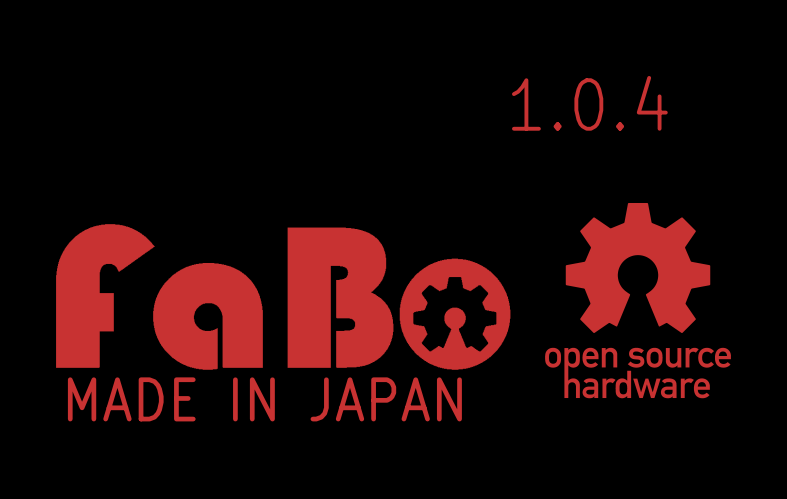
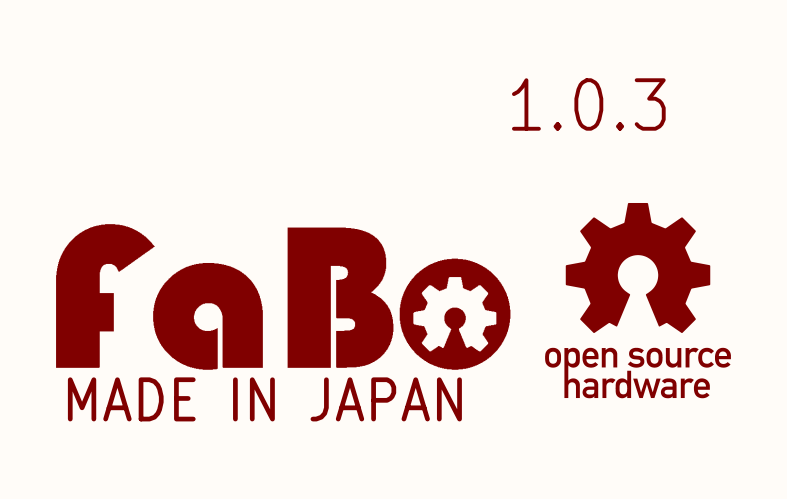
text: 1.0.4 (589, 103) -> 1.0.3 (588, 104)

